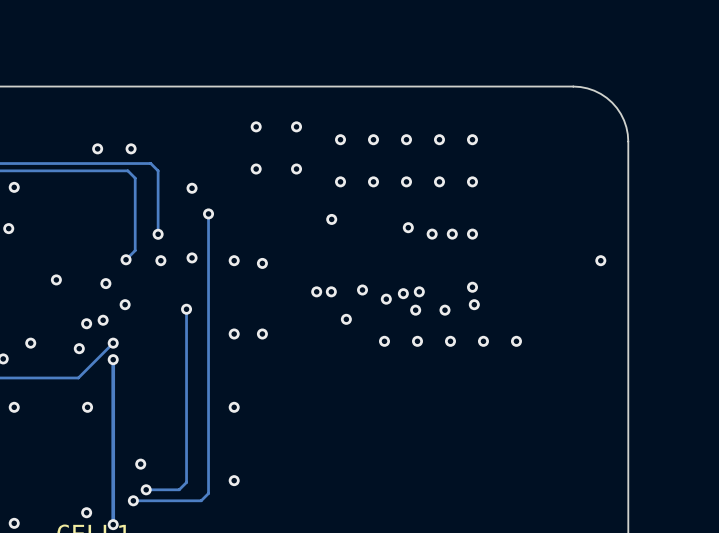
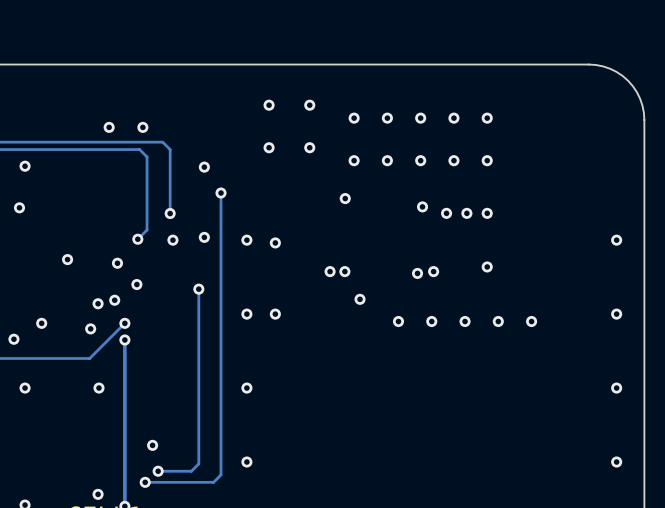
via: (362, 290) -> none
via: (386, 299) -> none
via: (474, 304) -> none
via: (415, 310) -> none
via: (444, 310) -> none
via: none -> (616, 314)
via: none -> (616, 388)
via: none -> (616, 462)

